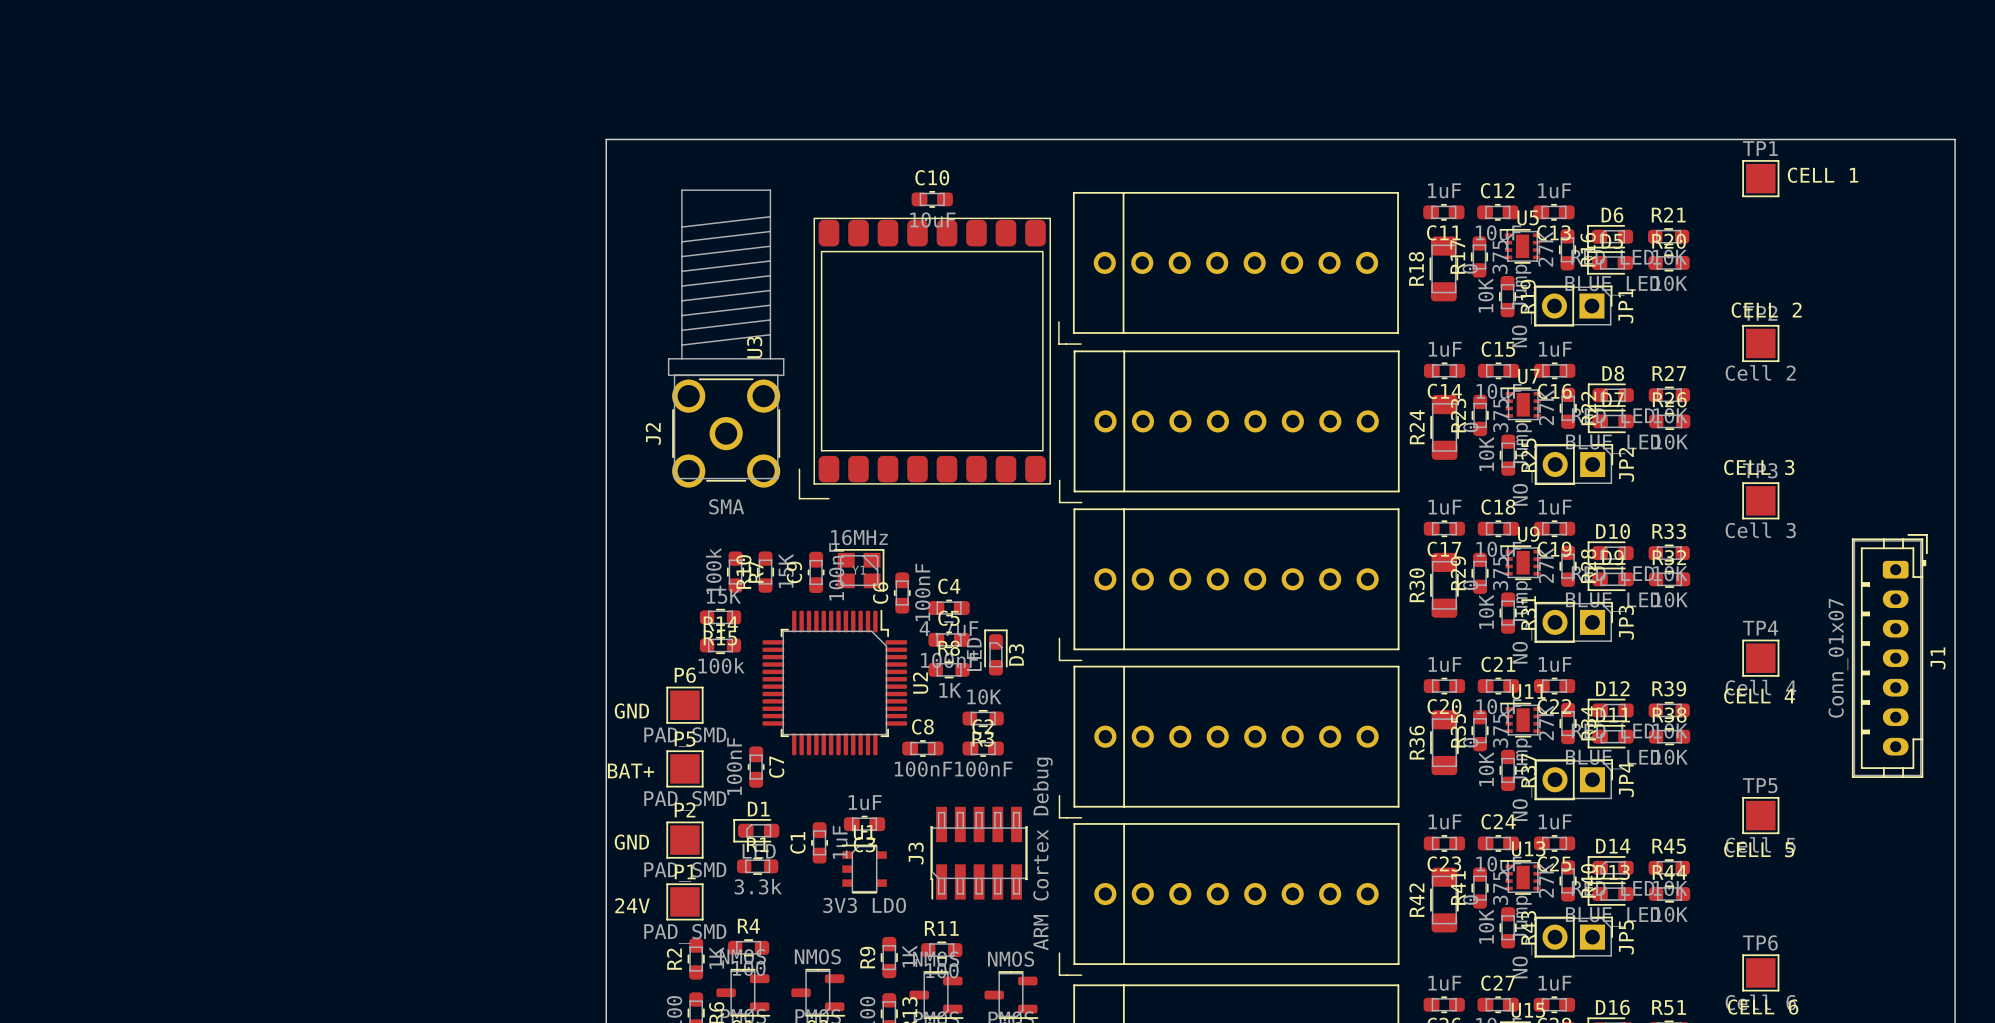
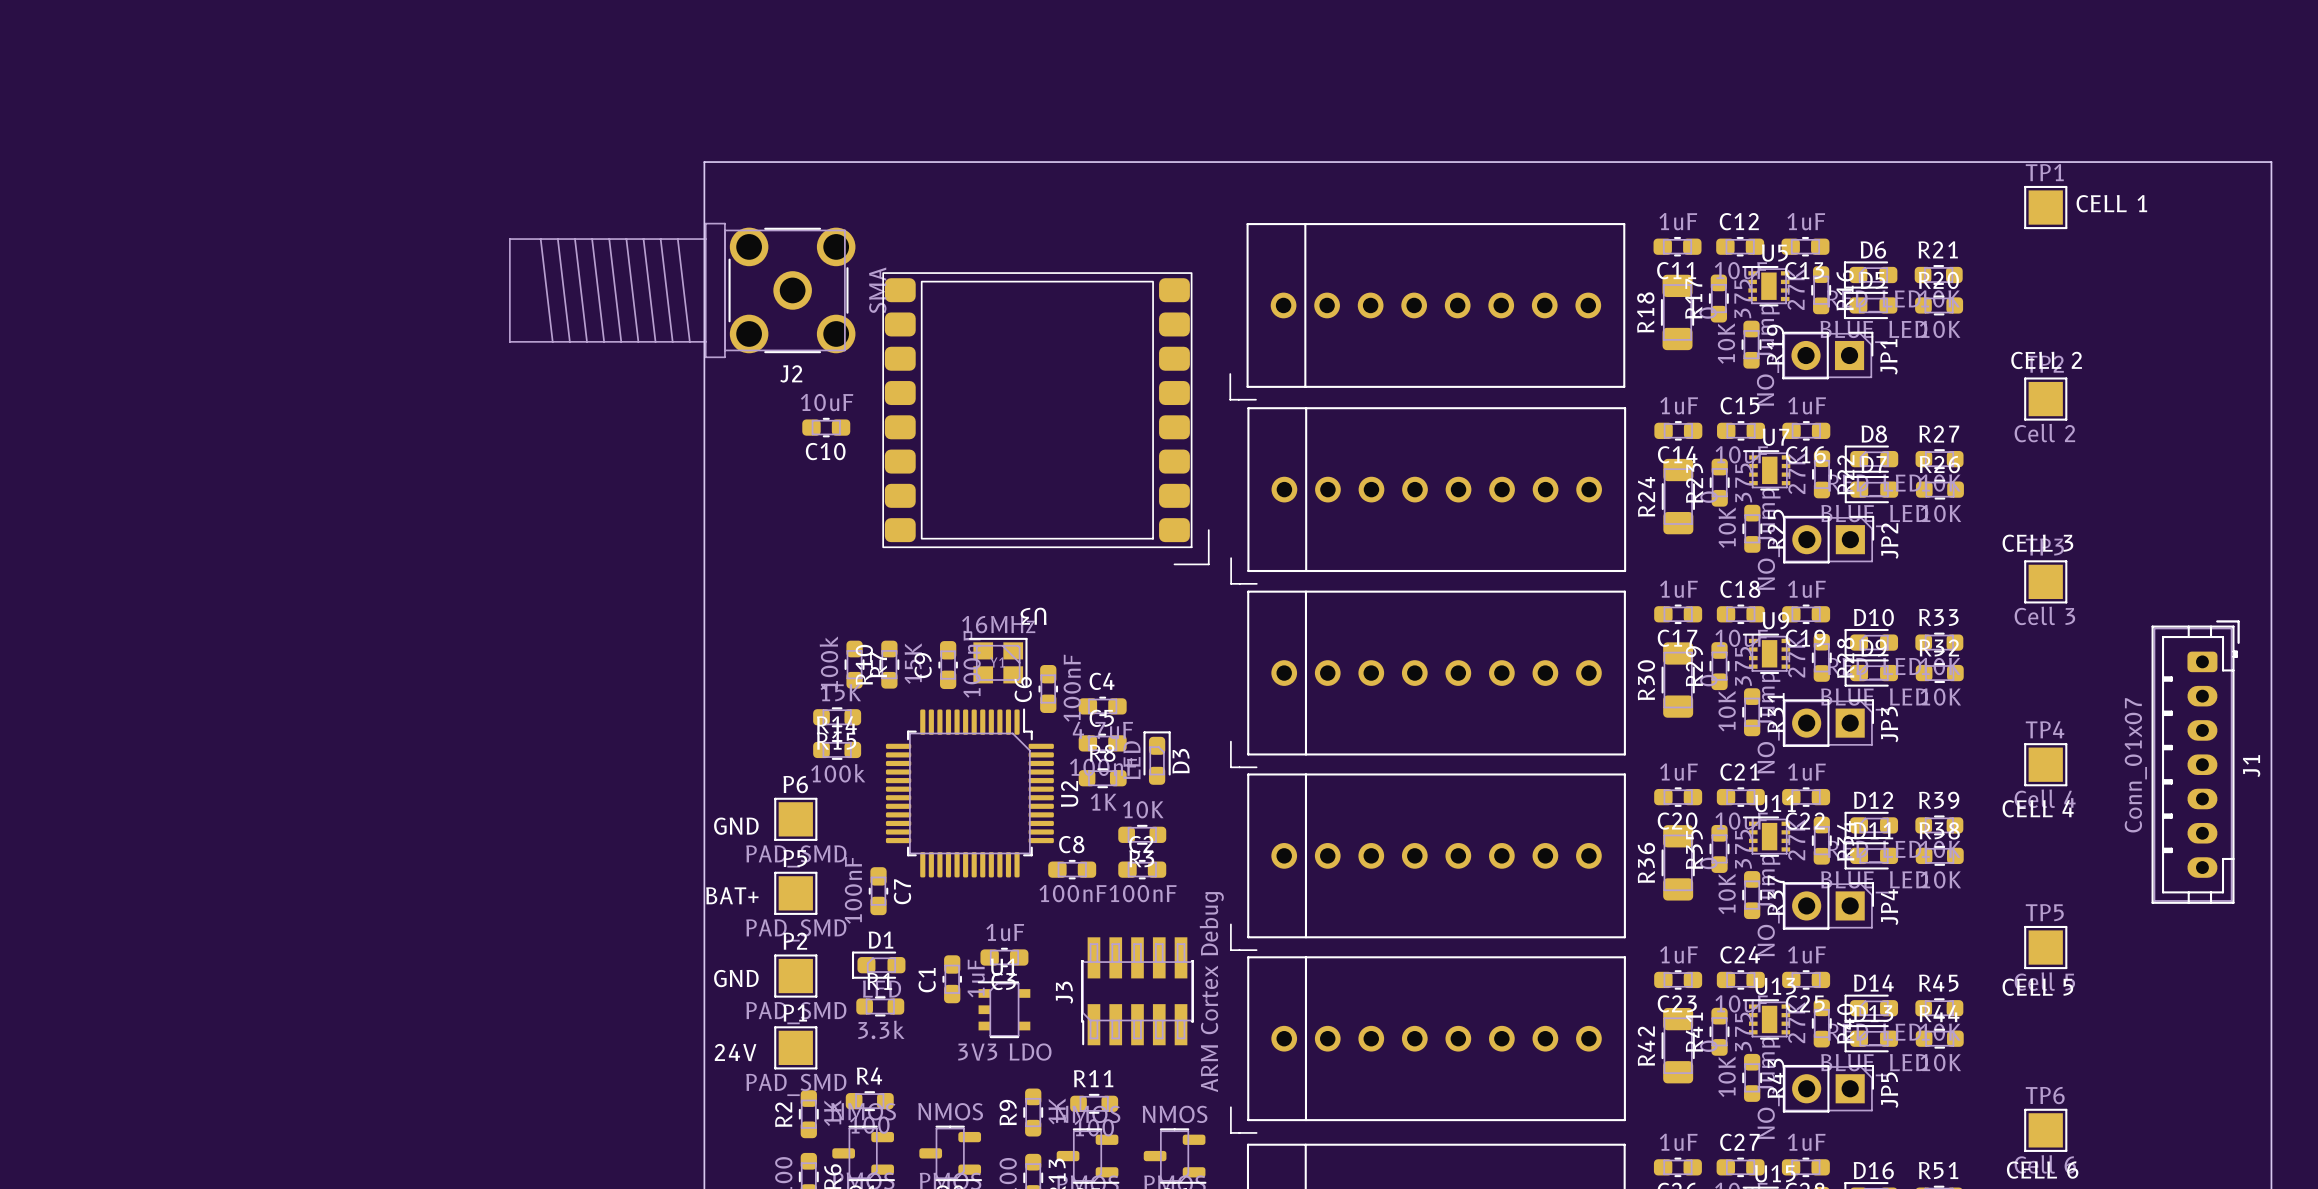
C10 name position: C10 (932, 177) -> C10 (825, 451)
C10 position: (932, 199) -> (826, 427)
C10 value position: 10uF (932, 219) -> 10uF (827, 402)
J2 rotation: 0° (726, 338) -> 90° counterclockwise (682, 290)
U3 rotation: 0° (924, 358) -> 90° counterclockwise (1045, 418)

